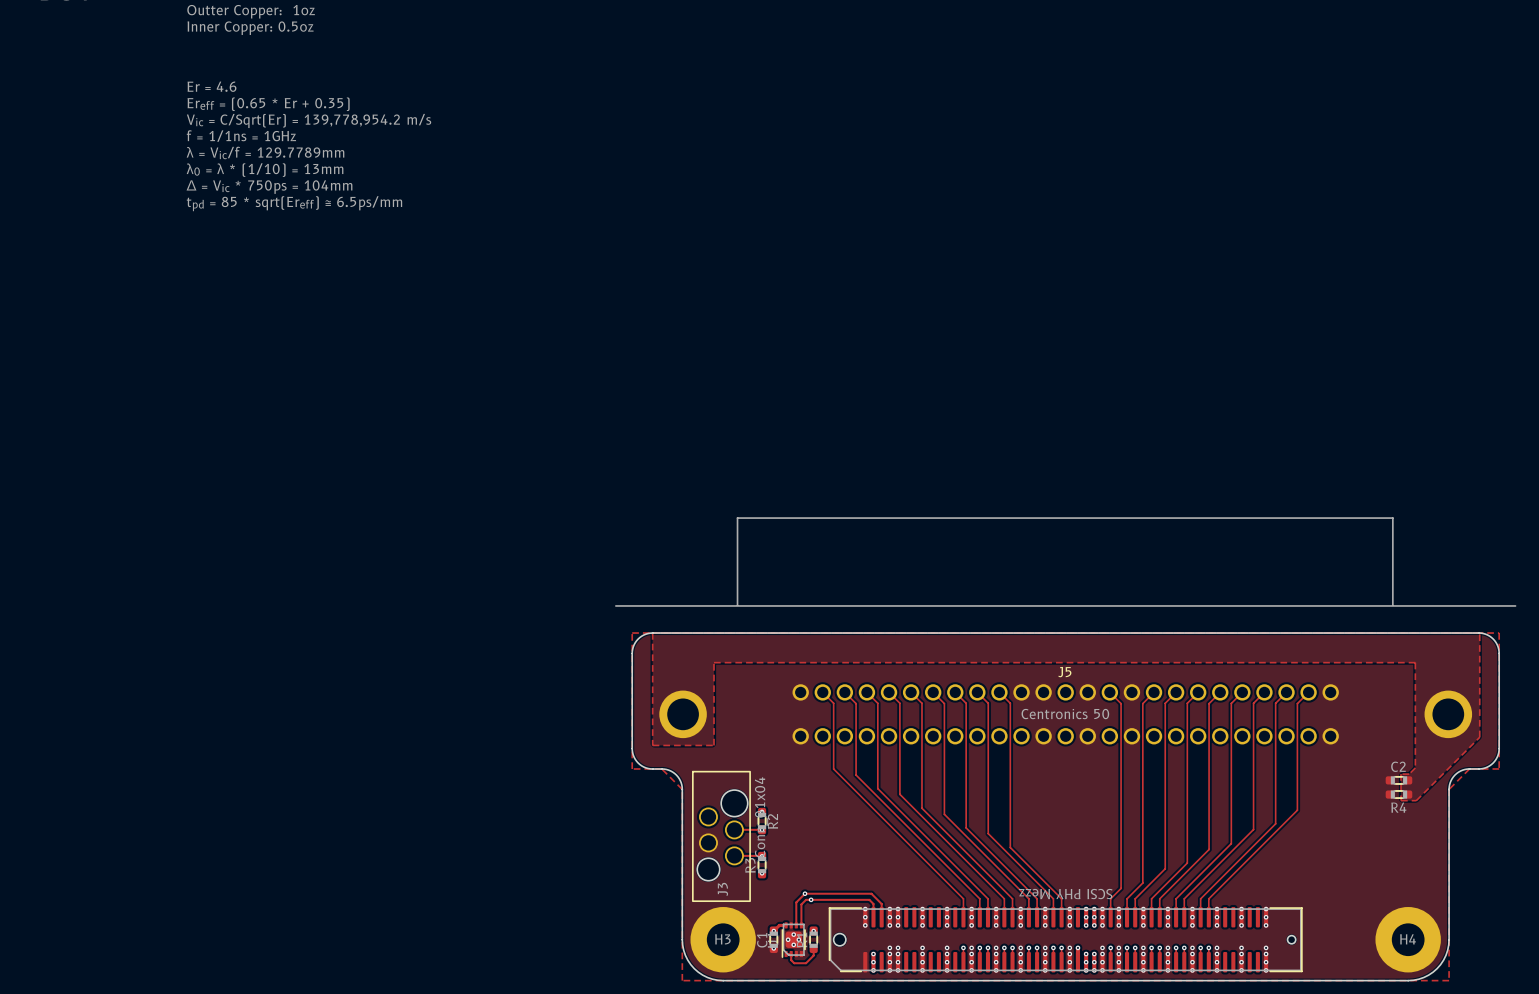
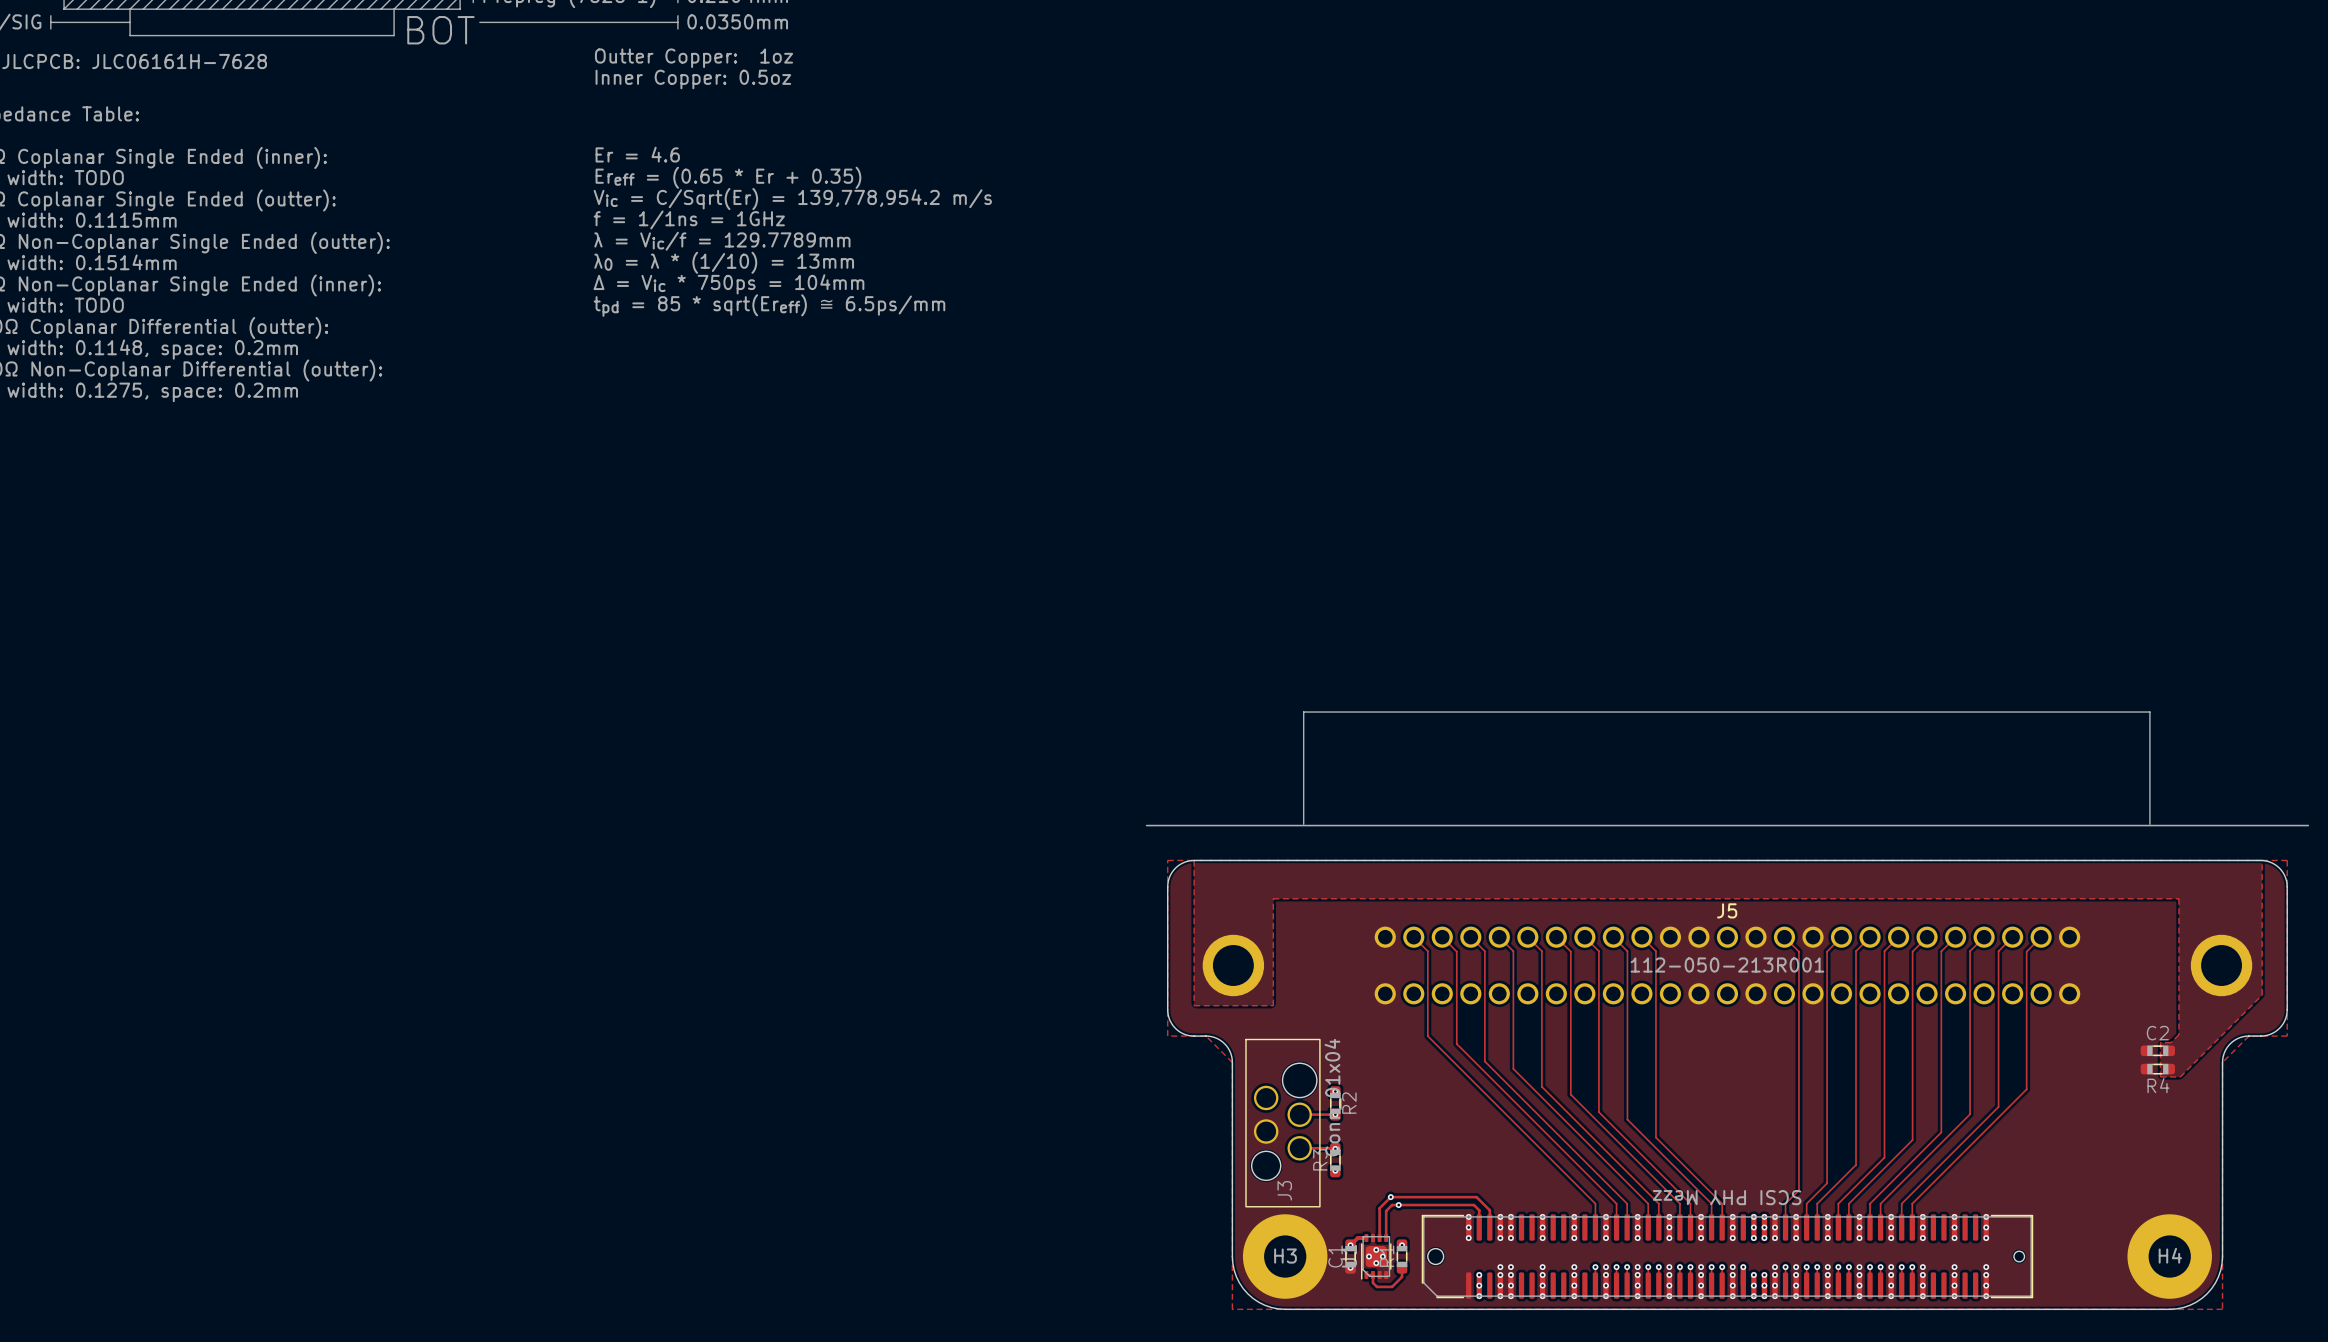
J5 value: Centronics 50 (1065, 714) -> 112-050-213R001 (1727, 965)

